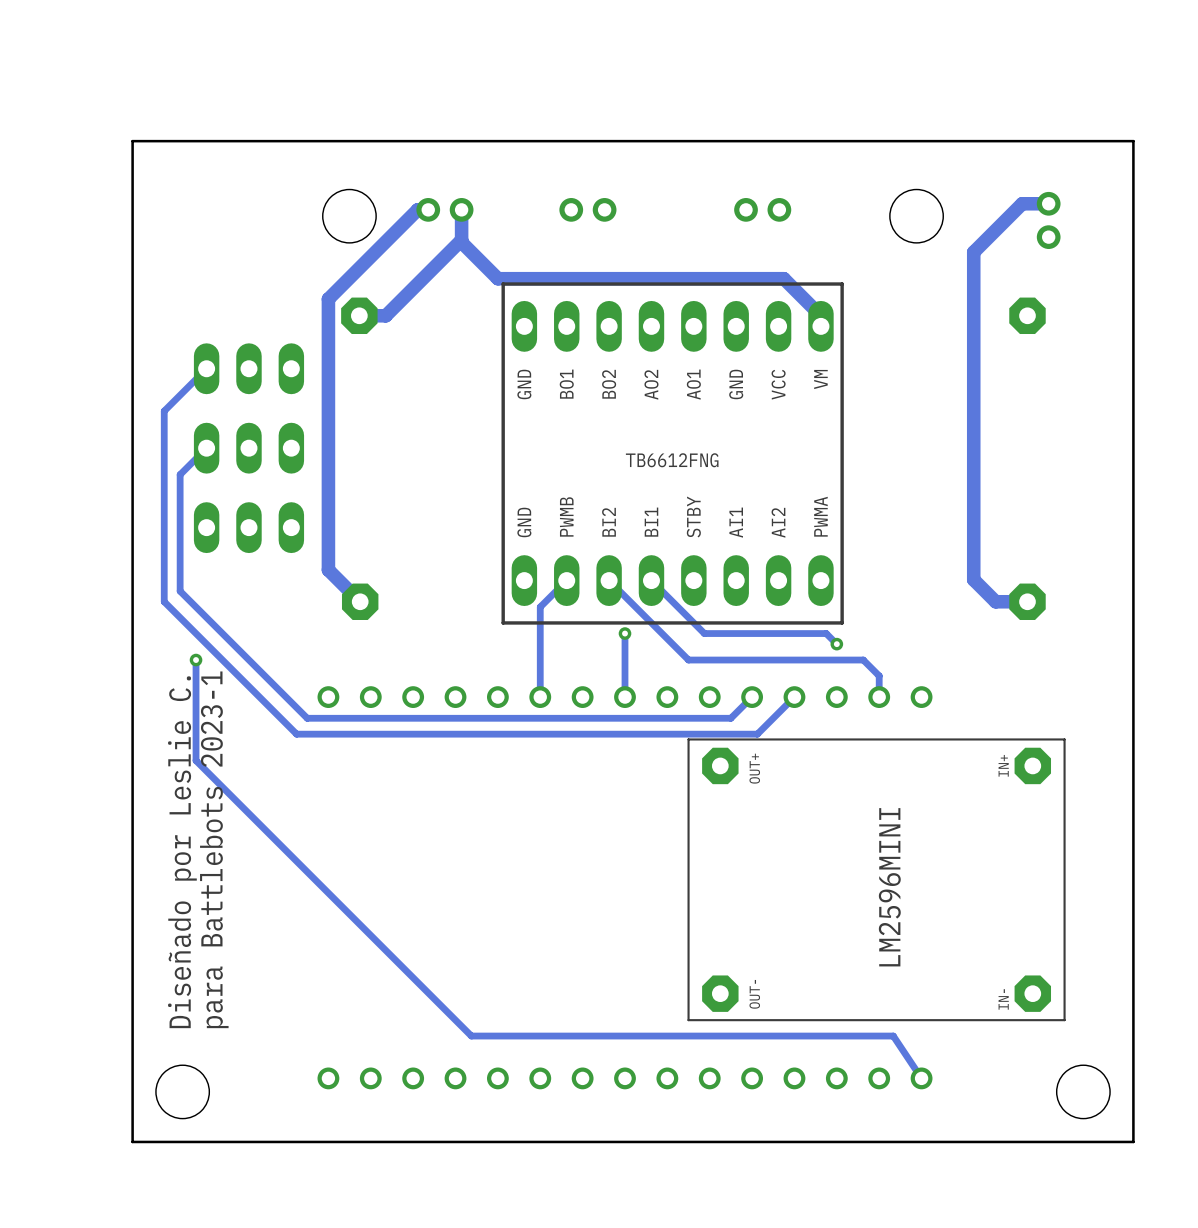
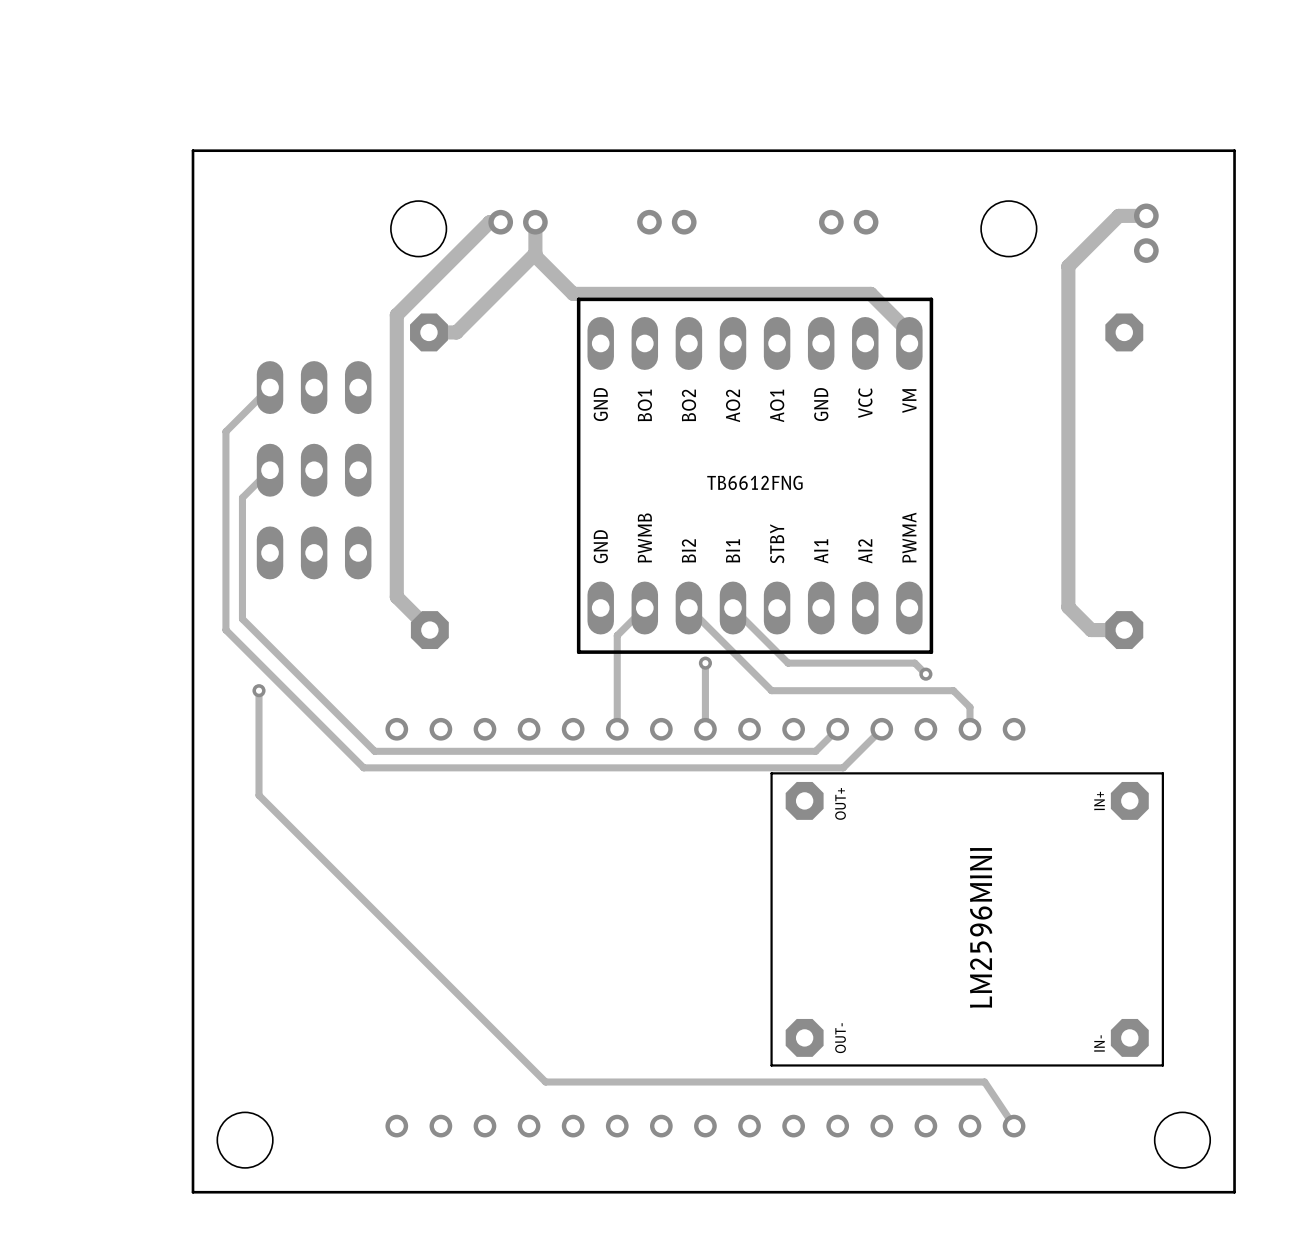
text: para Battlebots 2023-1 (214, 849) -> none
text: Diseñado por Leslie C. (182, 852) -> none

